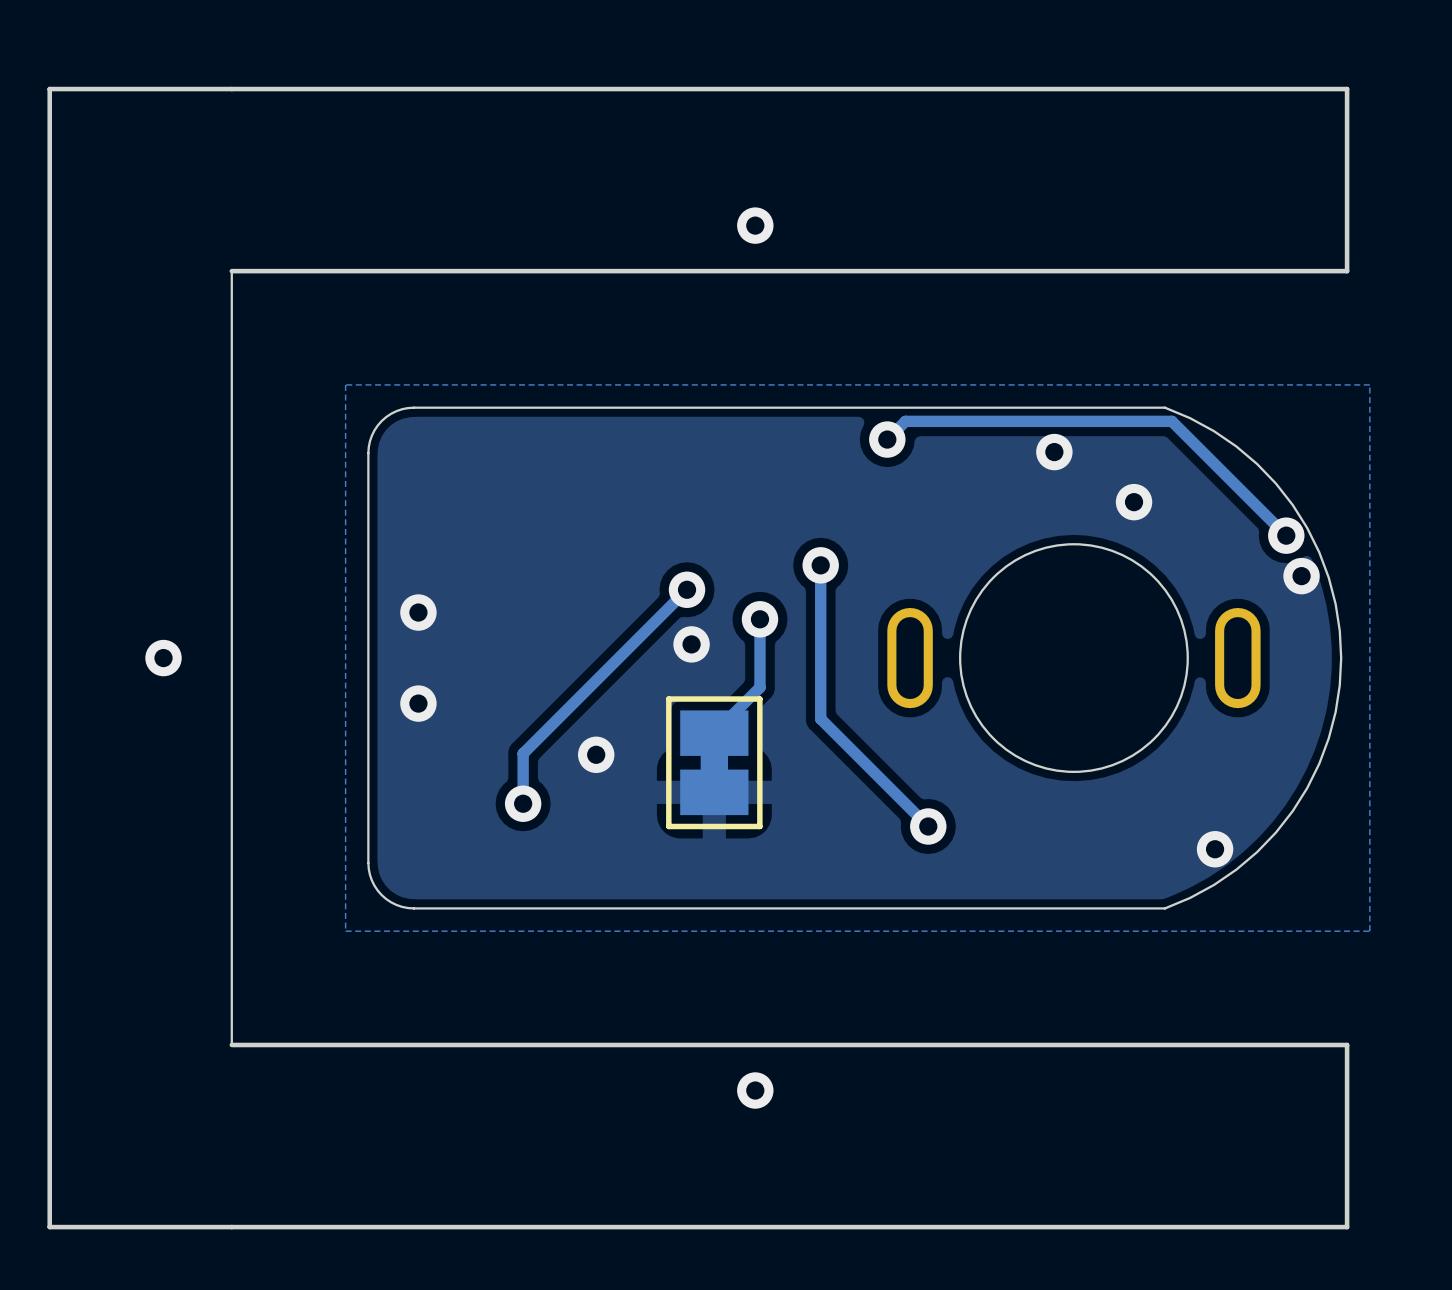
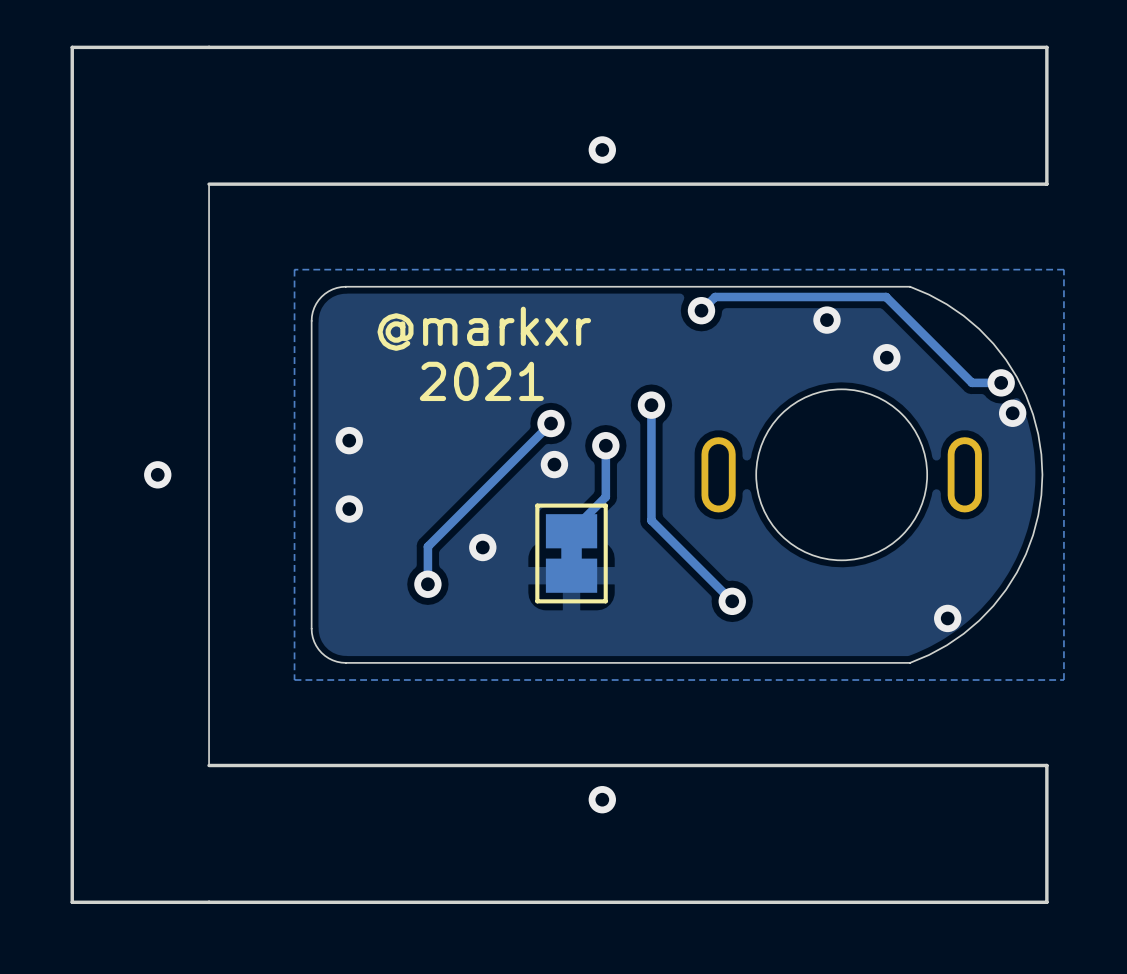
track: (1133, 421) (1171, 421) (1286, 535) -> (886, 297) (972, 382) (1001, 382)
text: none -> @markxr (484, 328)
text: none -> 2021 (481, 381)

